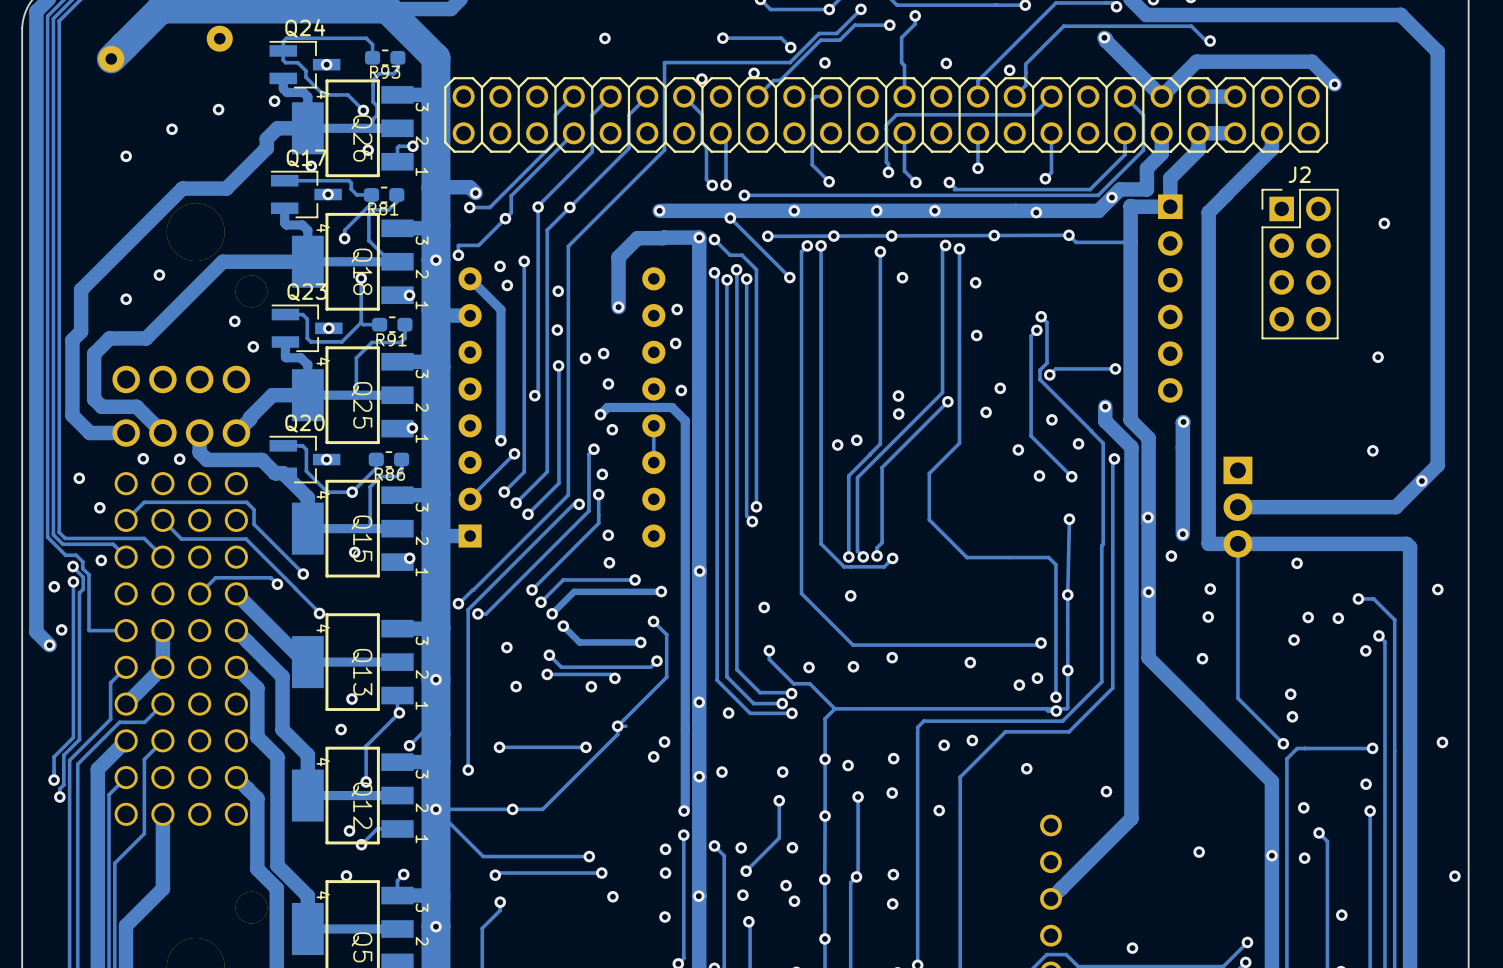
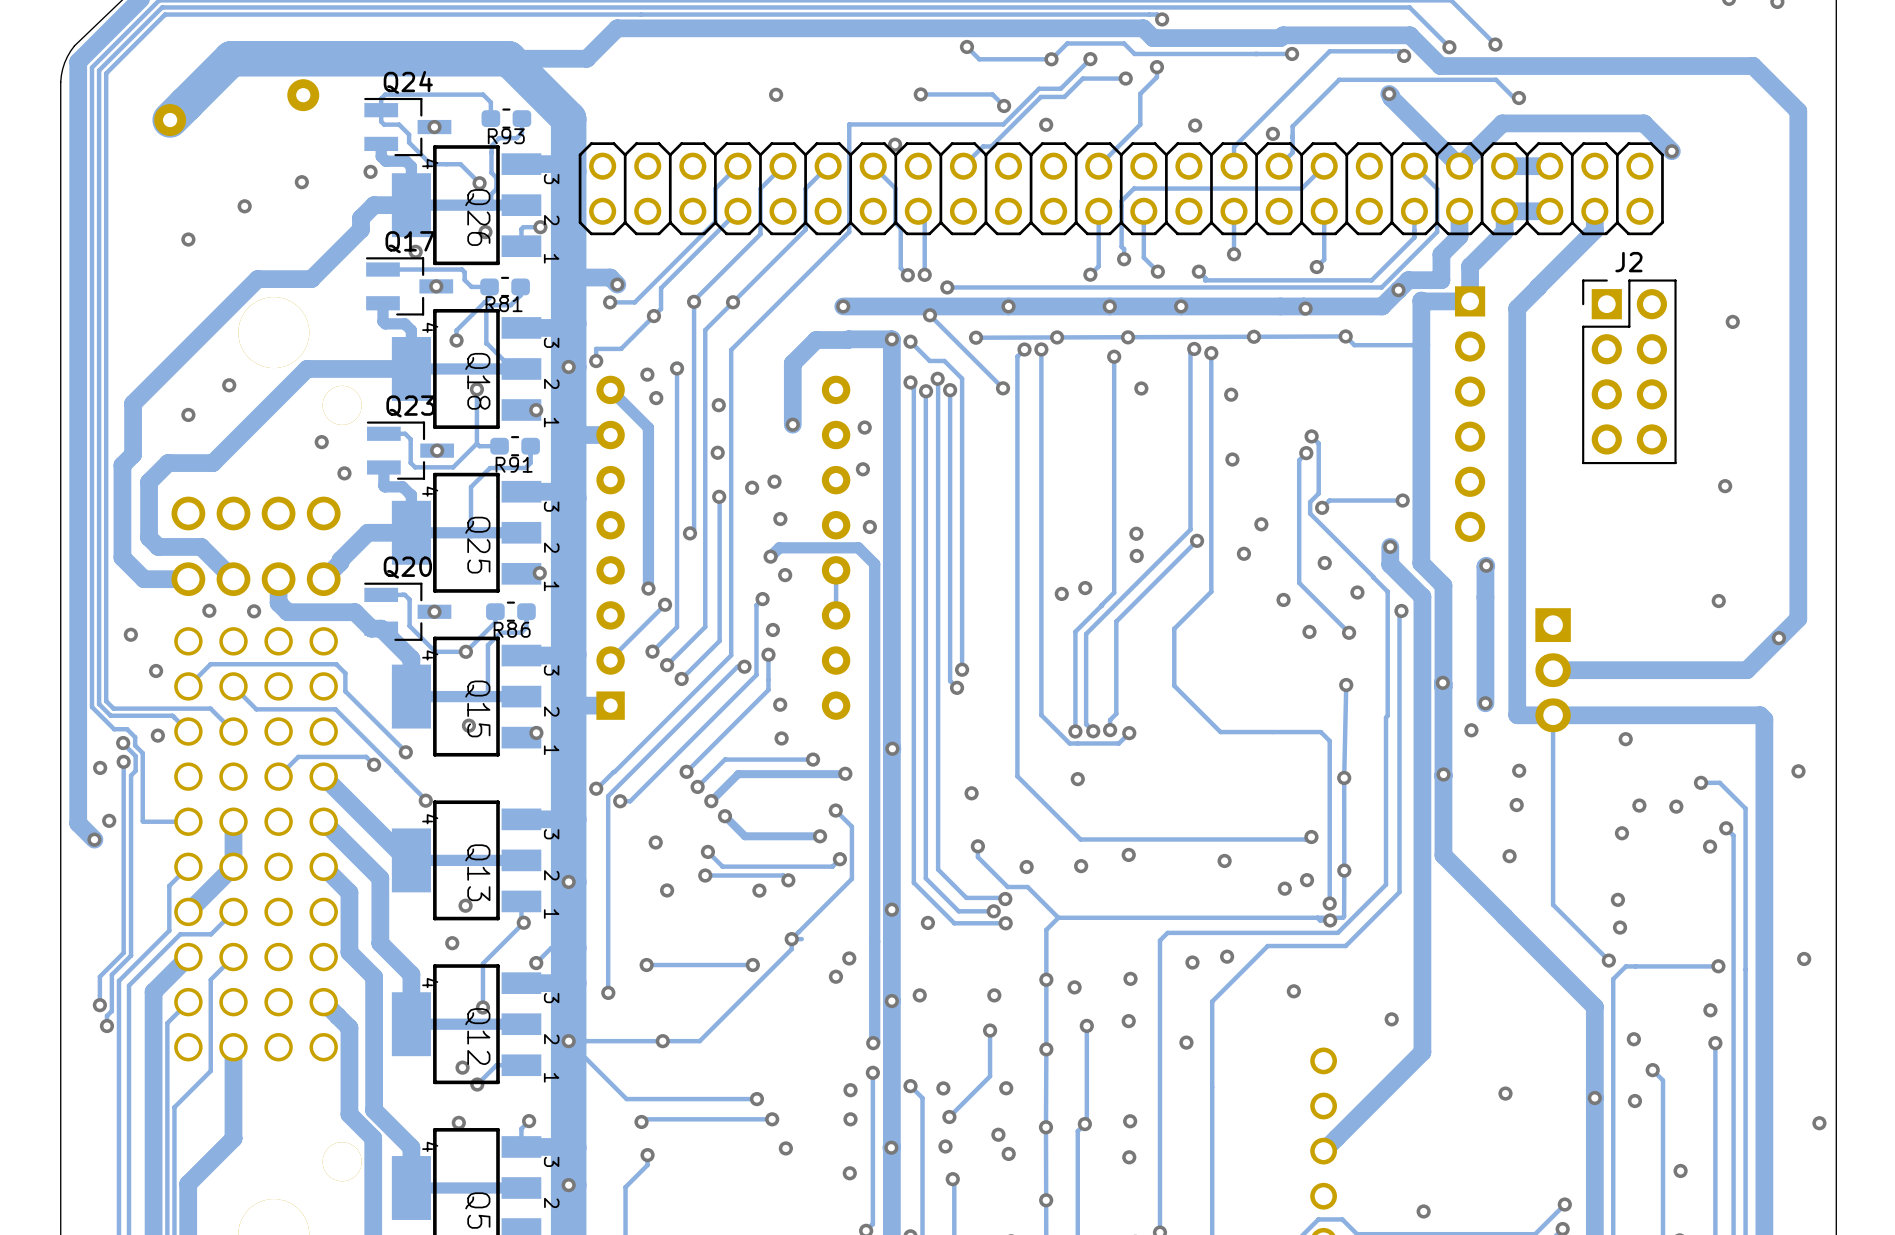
track: (901, 62) (904, 65) (904, 96) -> (1140, 124) (1098, 166)
via: (754, 73) -> none
track: (831, 96) (815, 96) (812, 99) (812, 164) (829, 181) -> none
track: none -> (1098, 211) (1098, 266) (1090, 274)
via position: (829, 181) -> (1090, 274)

